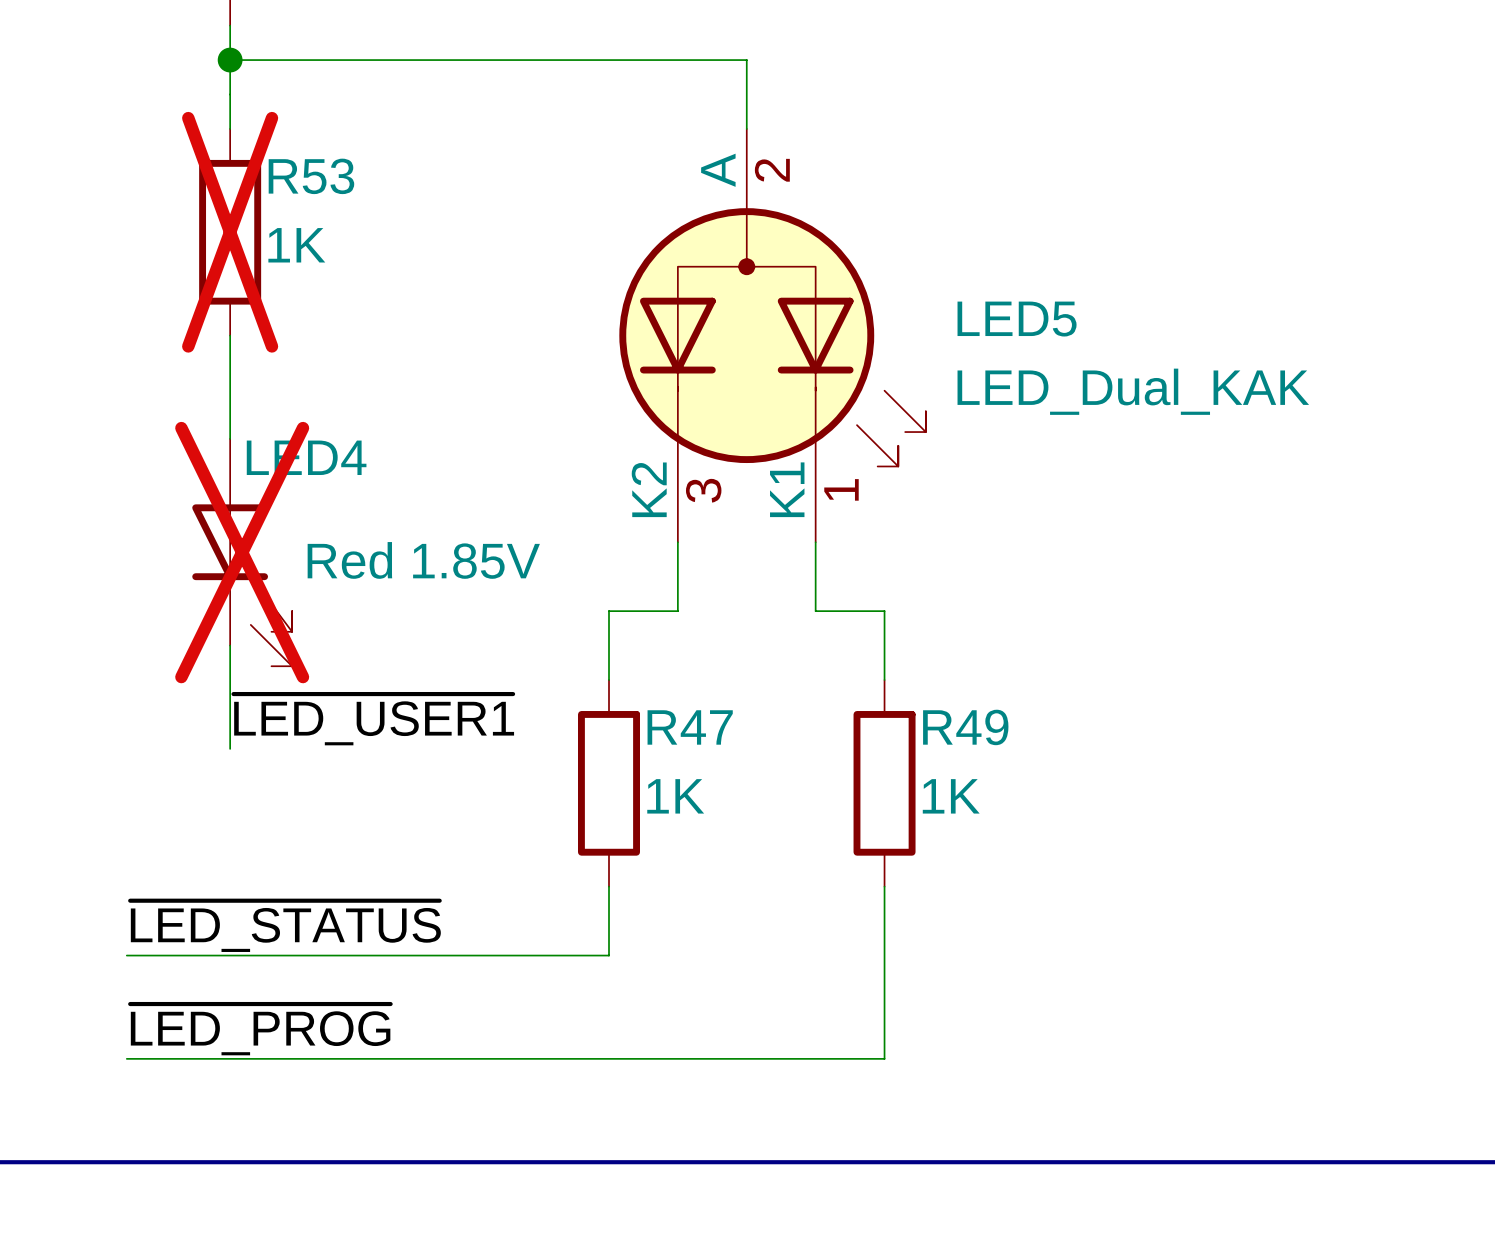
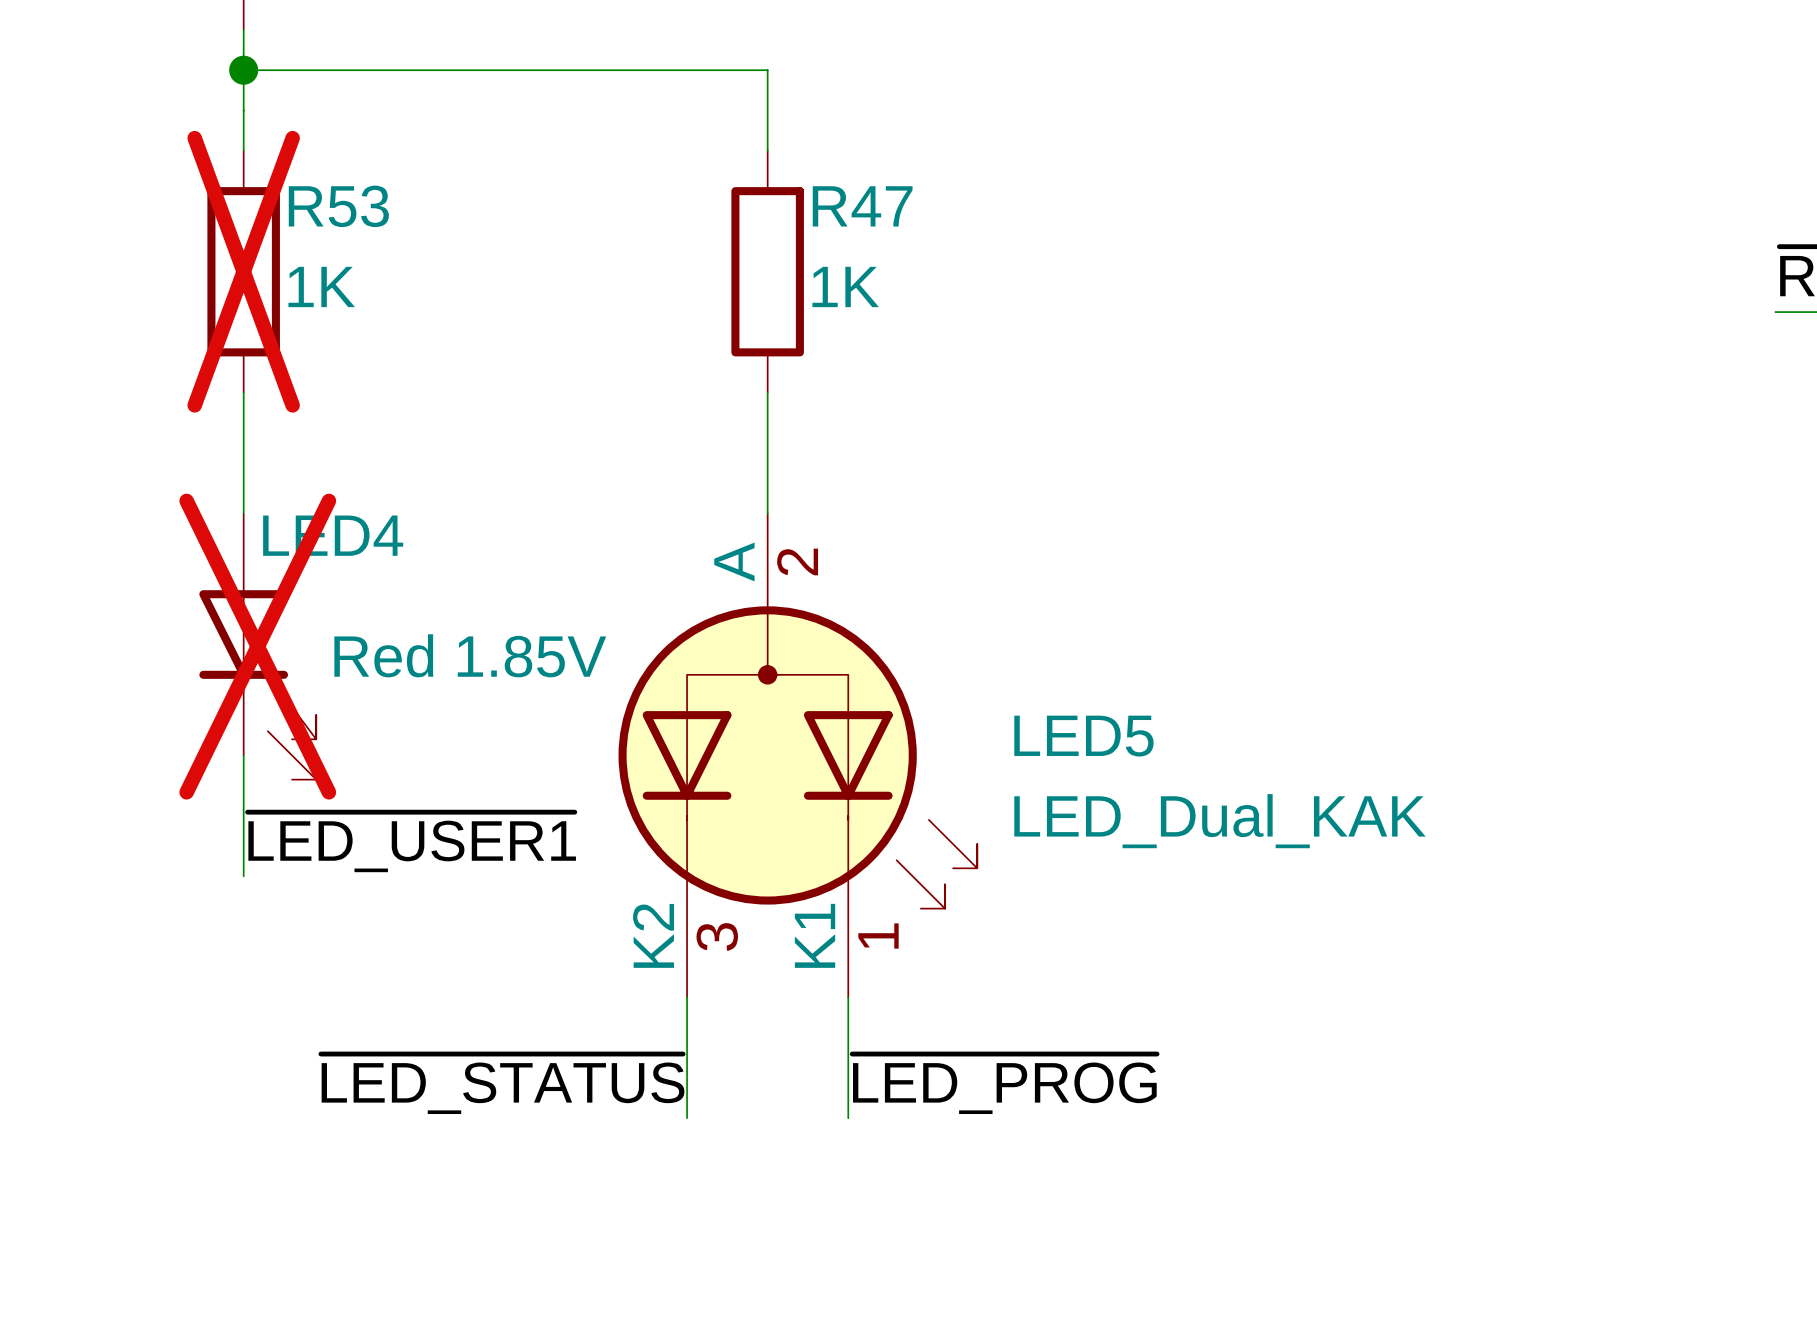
wire: (677, 60) (746, 60) (746, 128) -> (767, 70) (767, 150)
LED5 position: (772, 335) -> (797, 755)
wire: (815, 542) (815, 611) (884, 611) (884, 680) -> none
R47 position: (609, 783) -> (767, 271)
R49: 1K (884, 783) -> none
wire: none -> (848, 997) (848, 1118)
wire: (884, 886) (884, 1058) (126, 1058) -> none
label position: ~{LED_STATUS} (285, 926) -> ~{LED_STATUS} (502, 1084)
wire: (126, 955) (609, 955) -> none
label position: ~{LED_PROG} (260, 1029) -> ~{LED_PROG} (1004, 1084)

